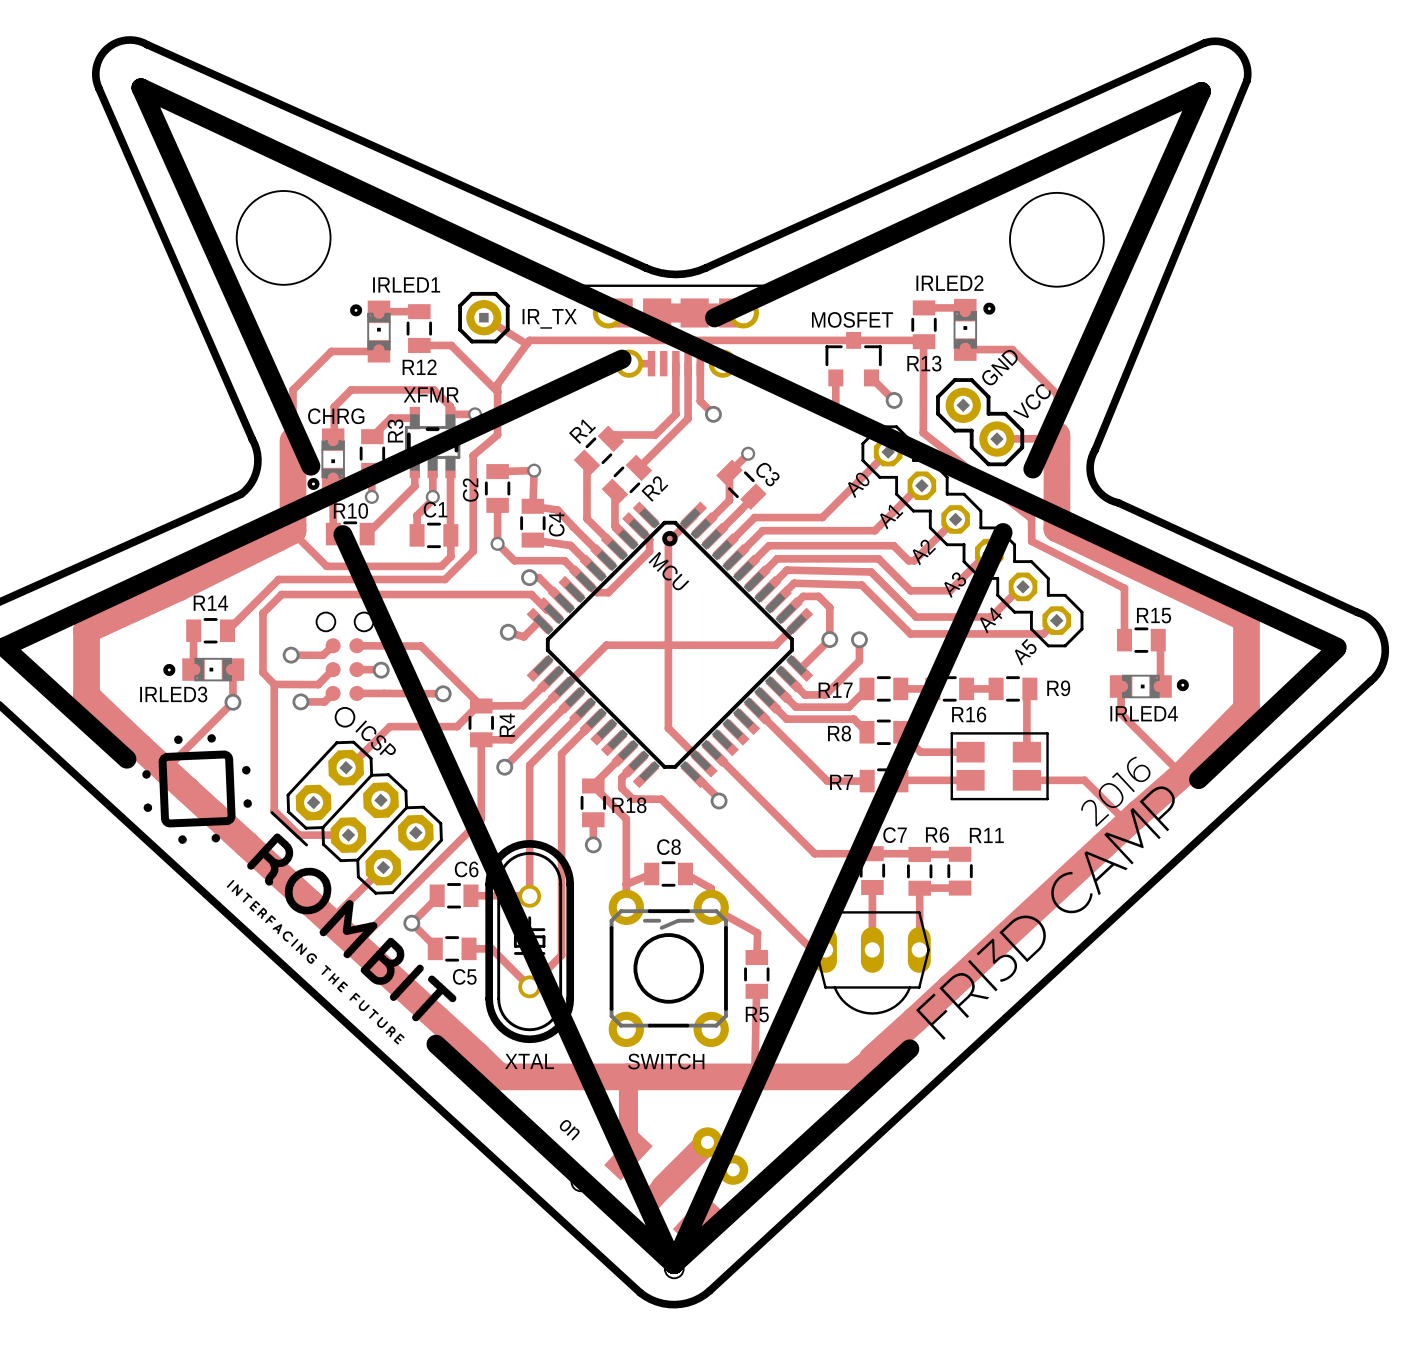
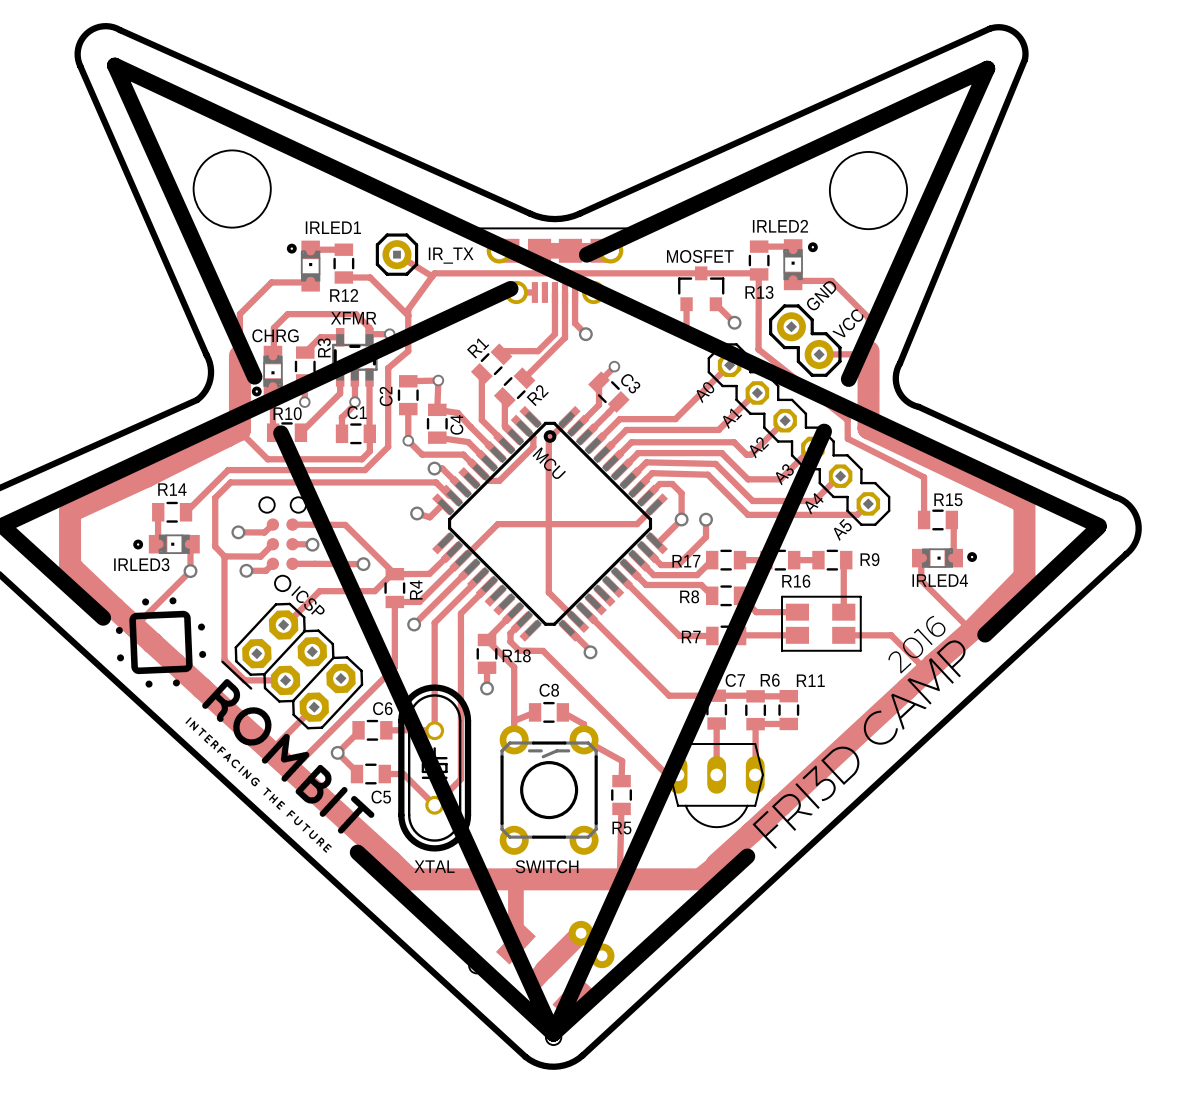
text: on (569, 1129) -> none

